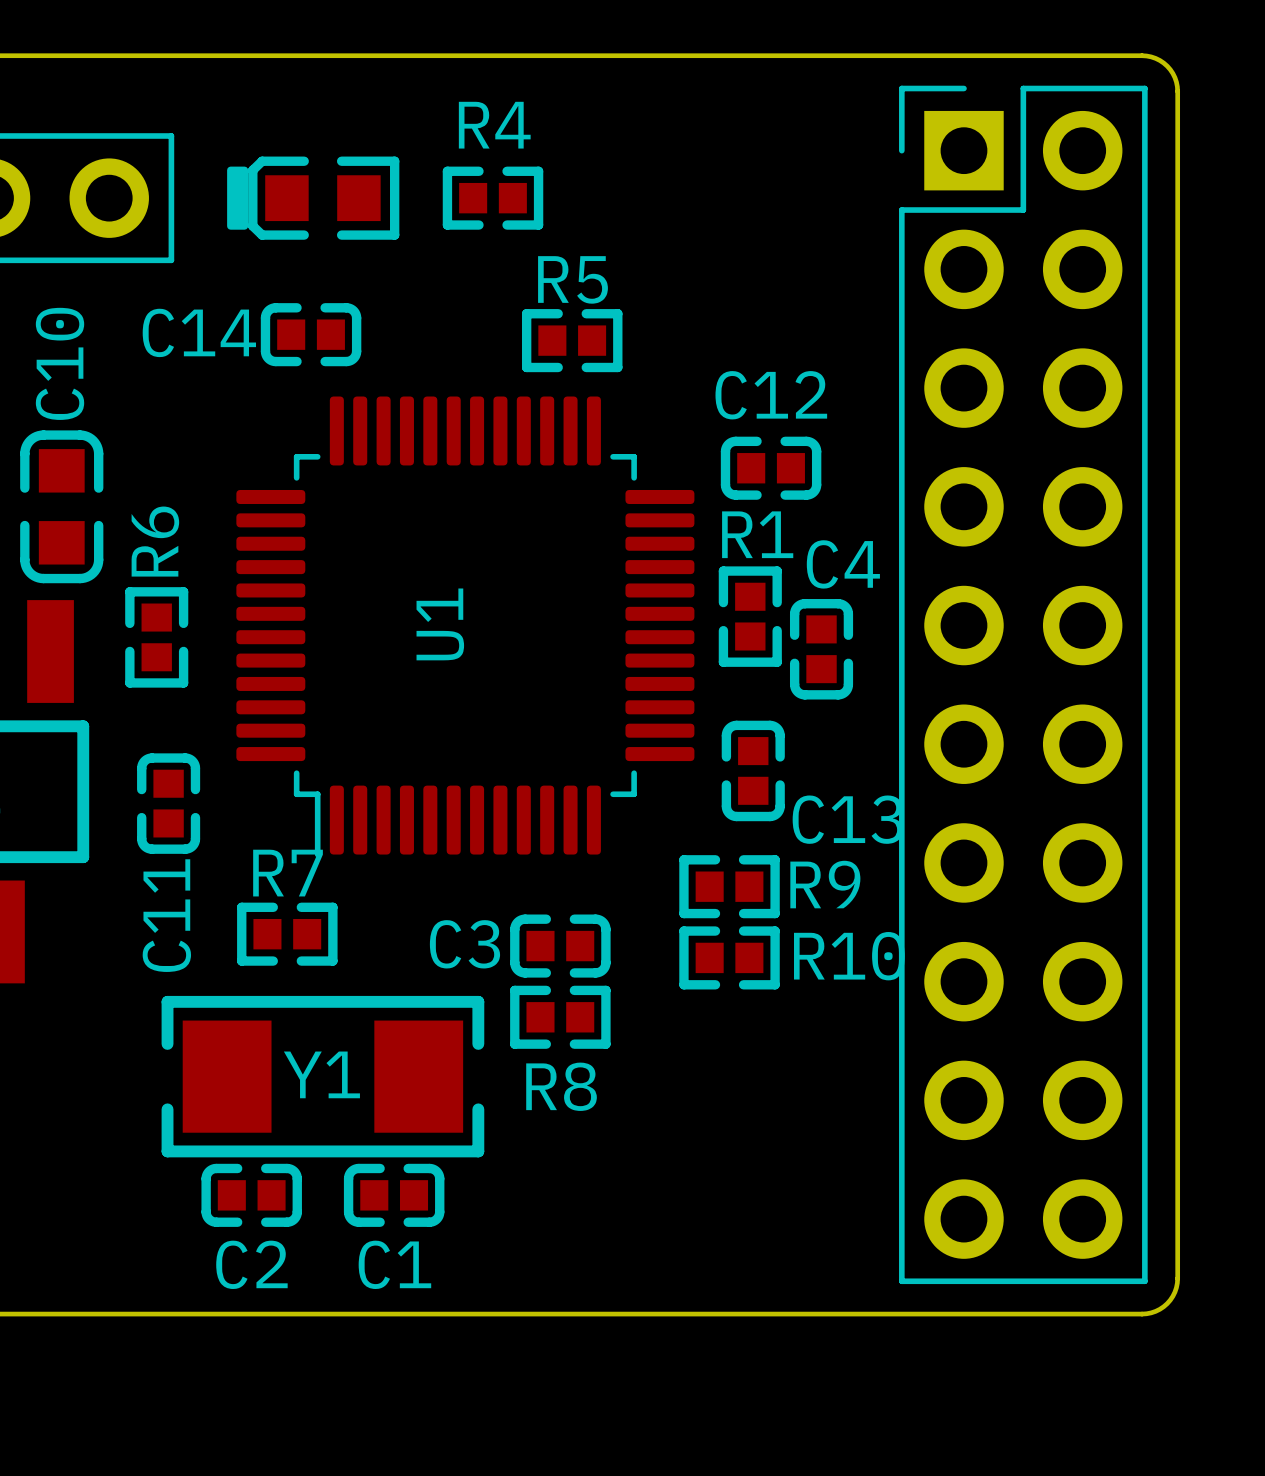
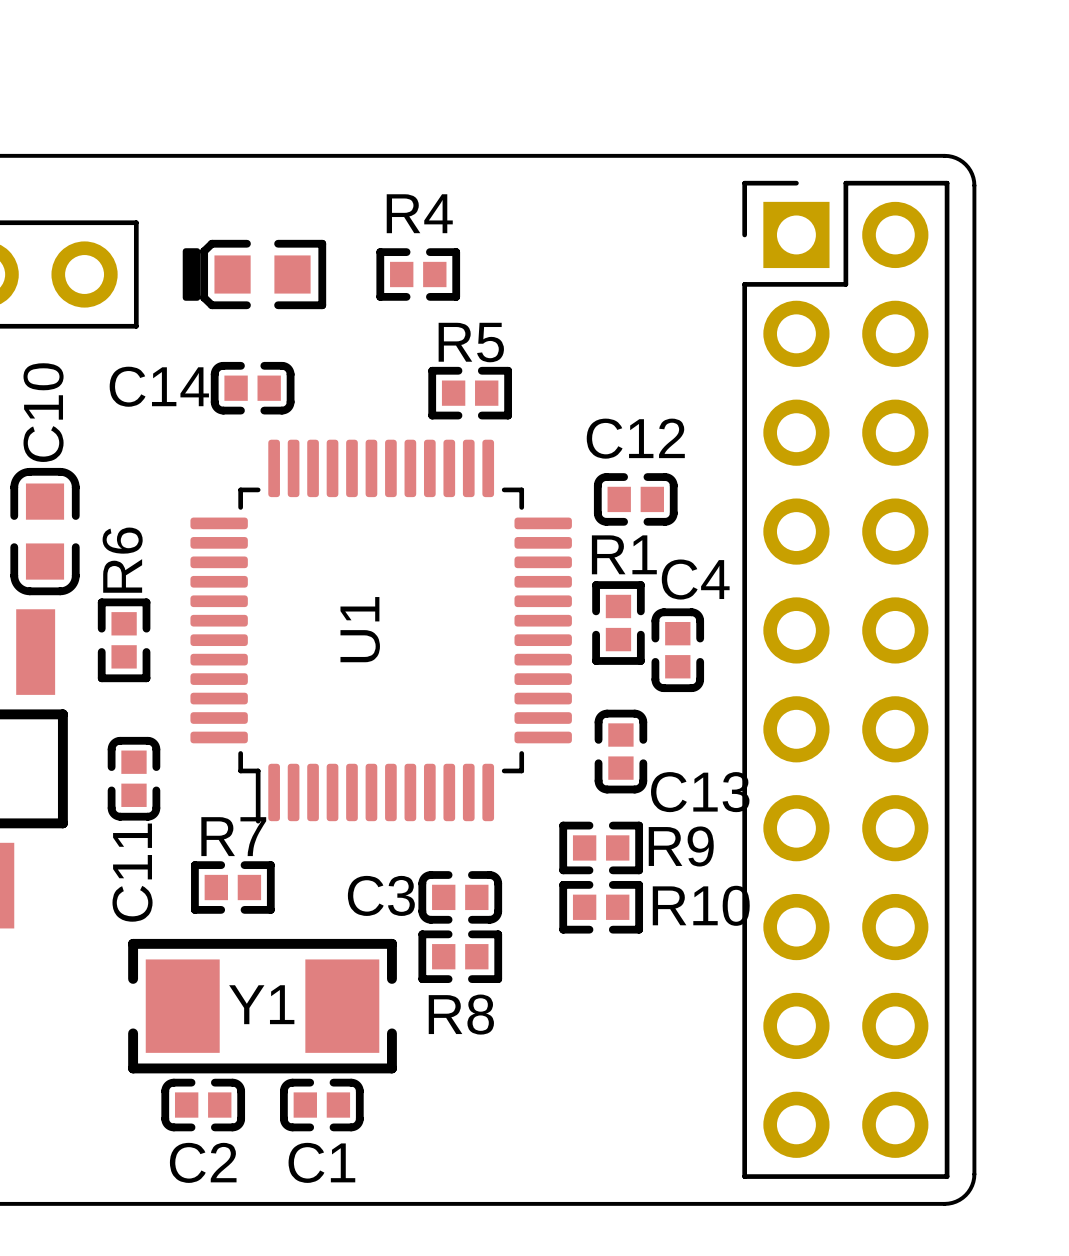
R4 position: (493, 198) -> (418, 274)

